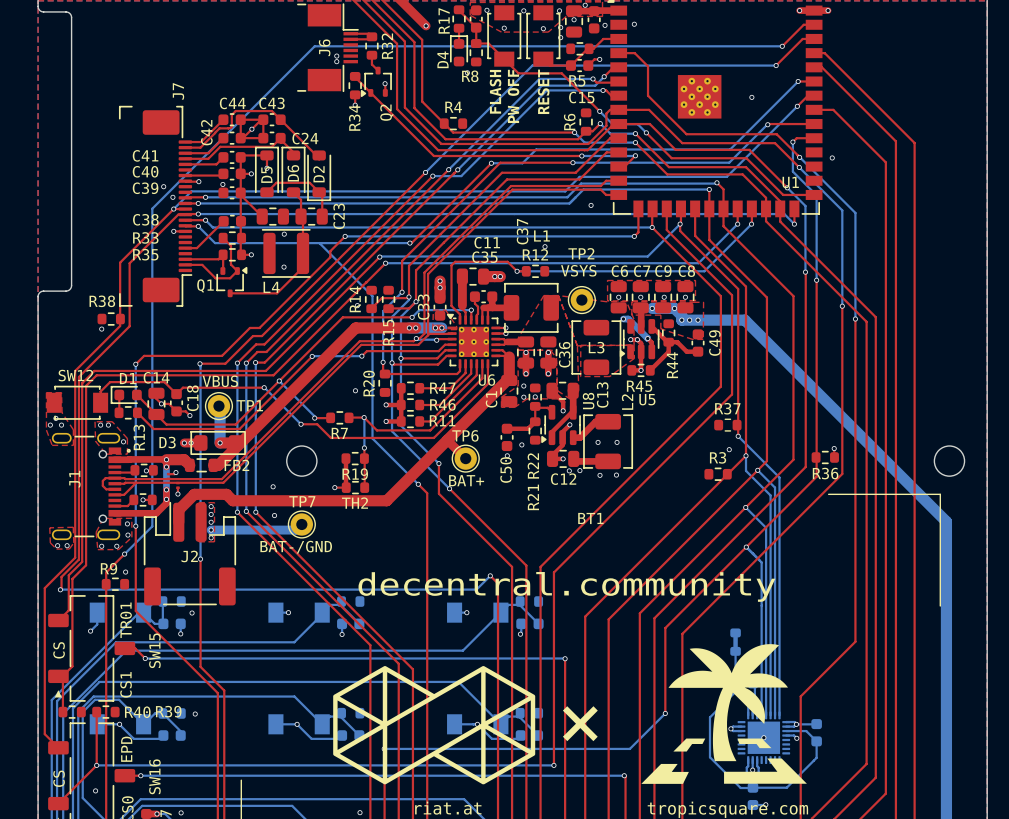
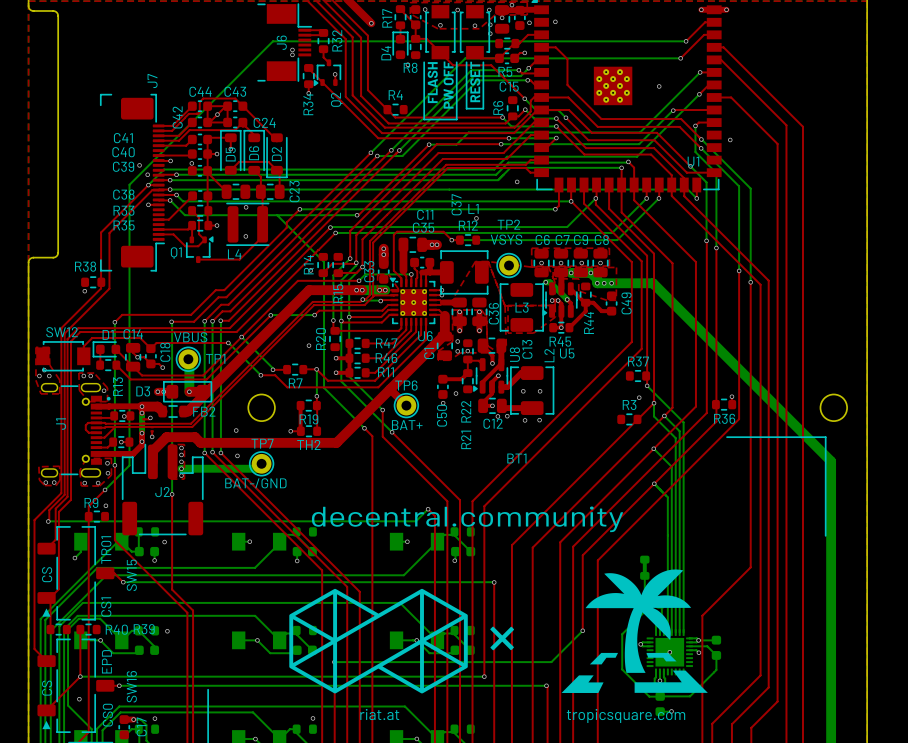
line: none -> (424, 62) (424, 119) (456, 119) (456, 62)
line: none -> (466, 62) (466, 108) (483, 108) (483, 62)

